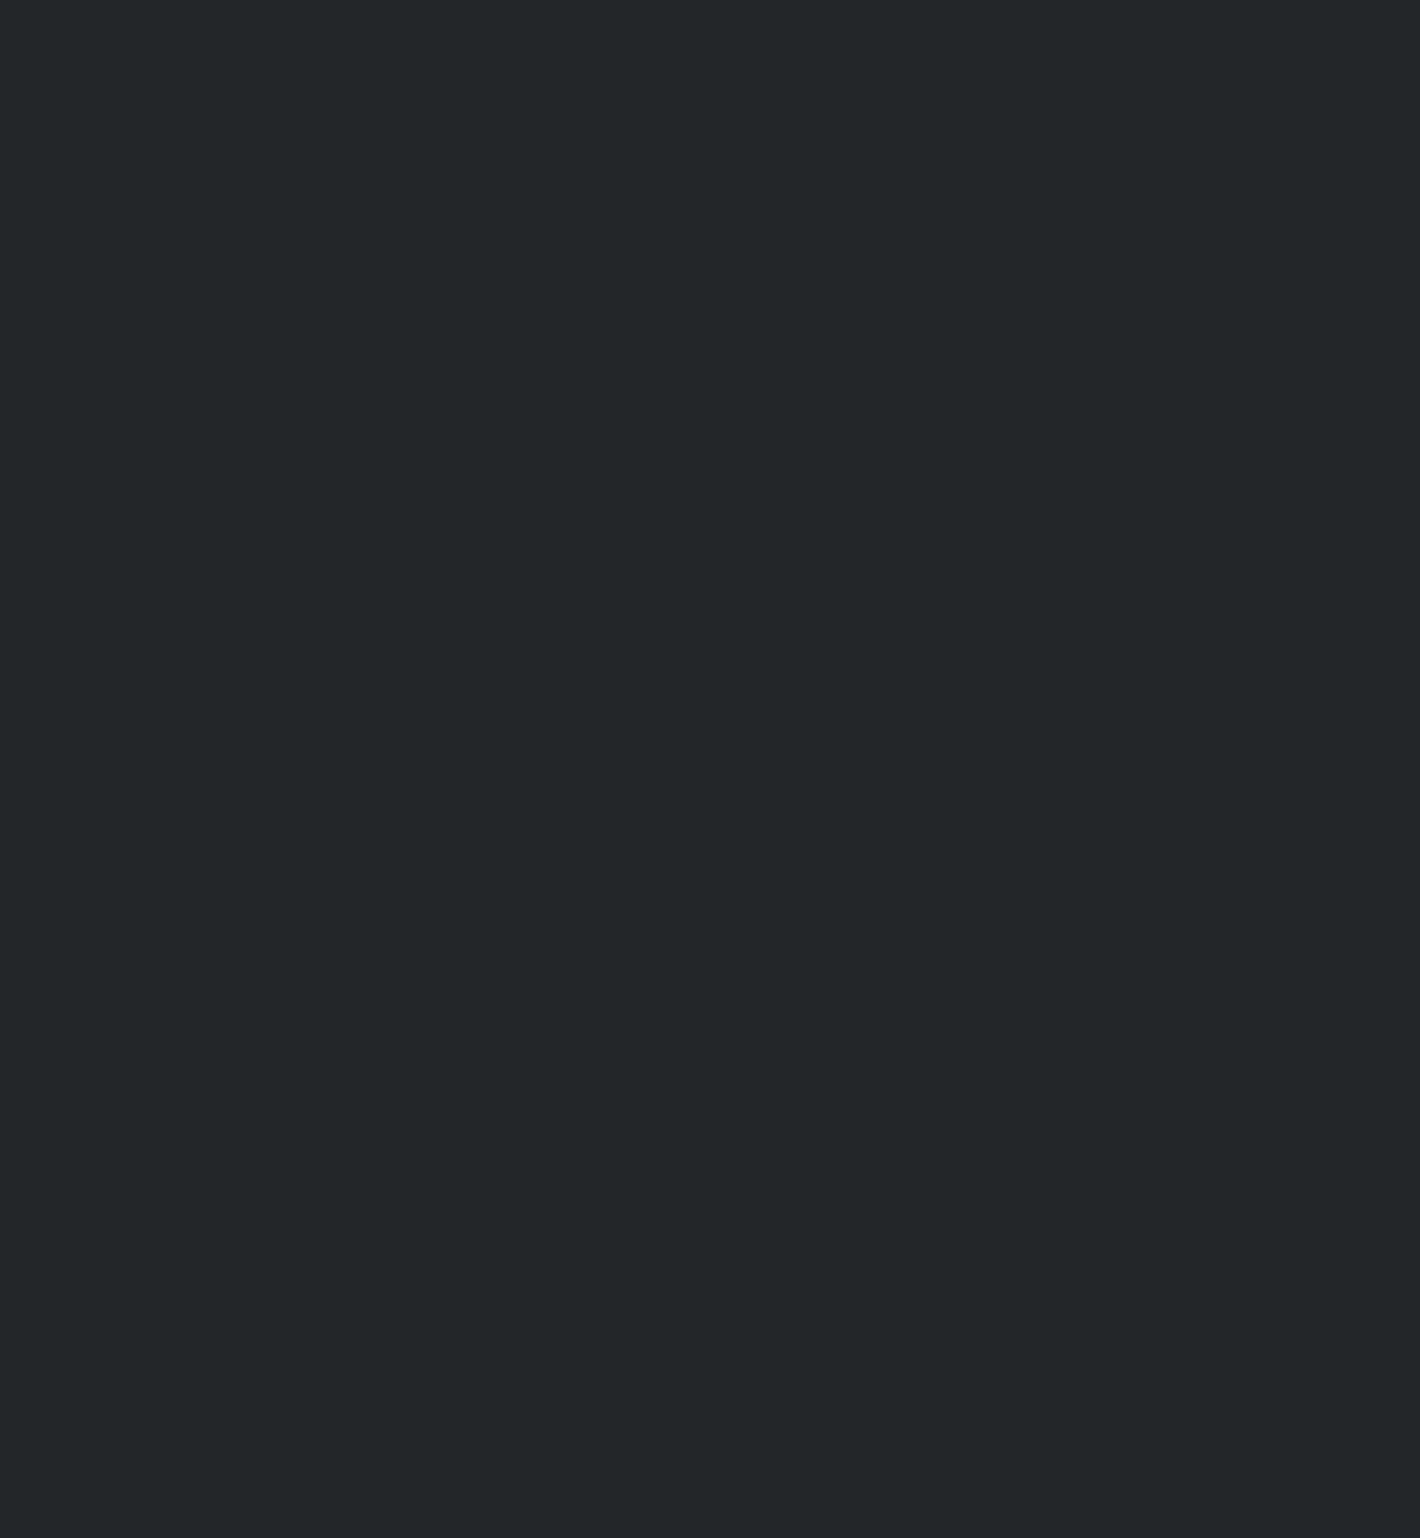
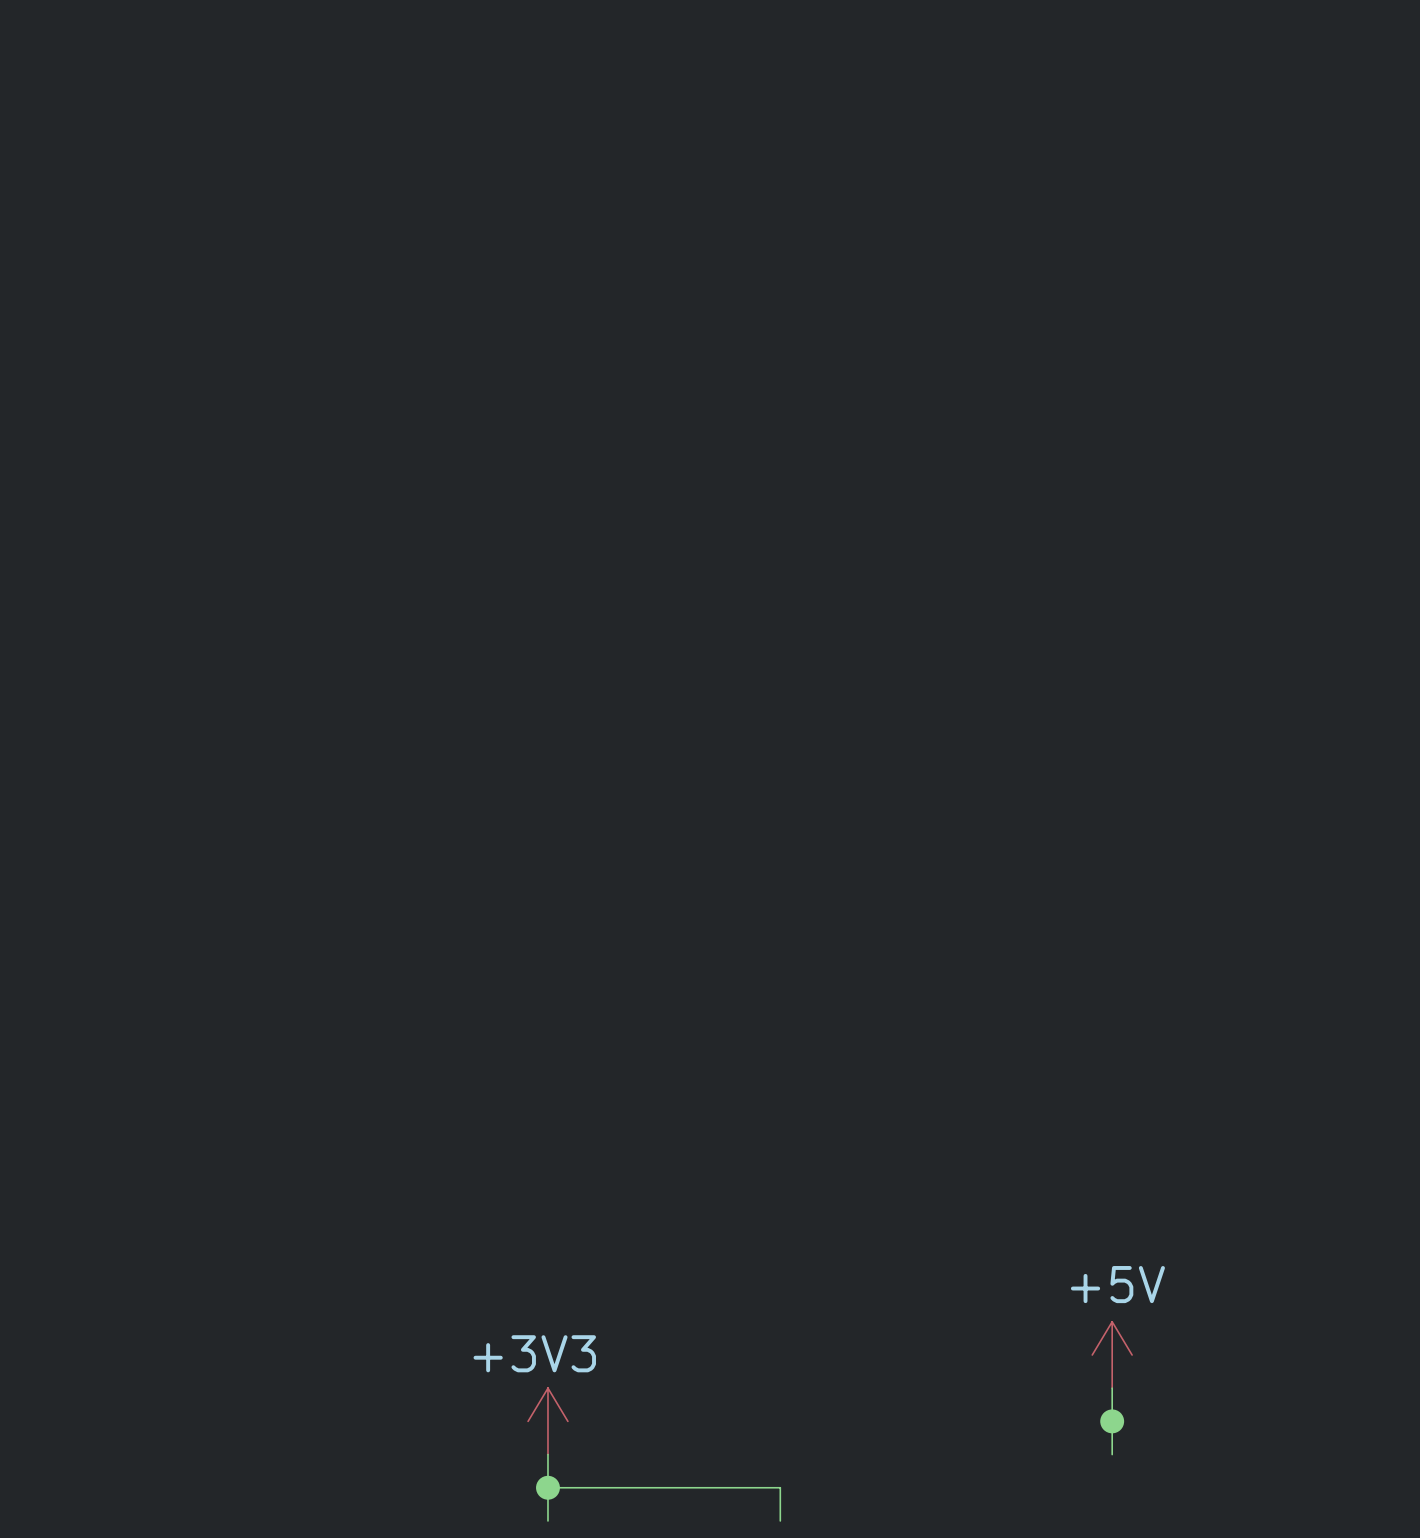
power symbol: none -> +5V (1112, 1355)
wire: none -> (1112, 1388) (1112, 1454)
power symbol: none -> +3V3 (547, 1421)
junction: none -> (1112, 1421)
wire: none -> (547, 1454) (547, 1520)
wire: none -> (547, 1487) (780, 1487) (780, 1520)
junction: none -> (547, 1487)

